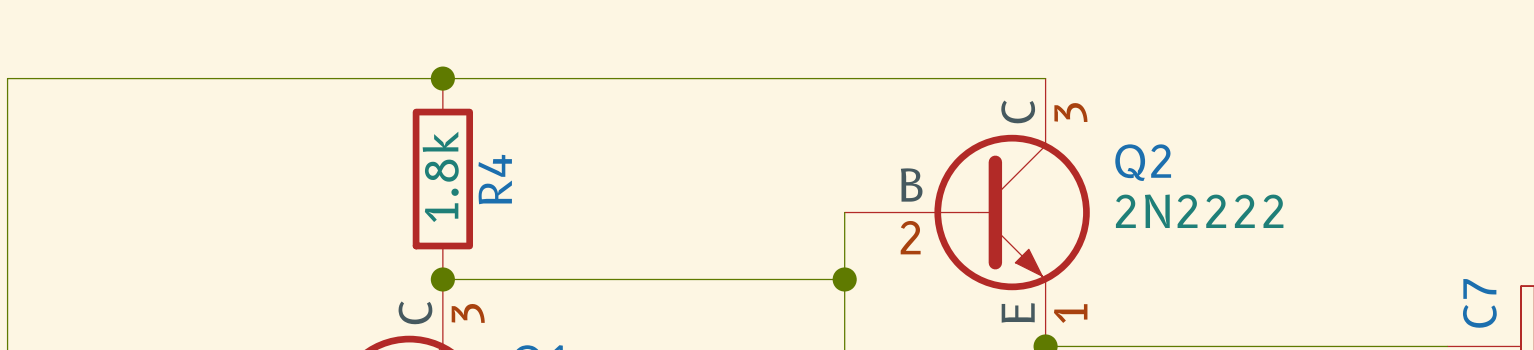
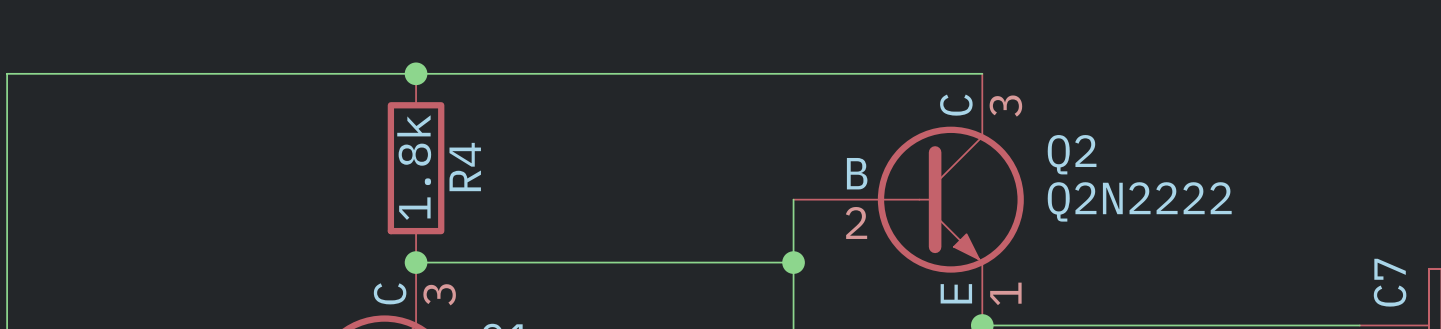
Q2 value: 2N2222 (1199, 211) -> Q2N2222 (1139, 201)

